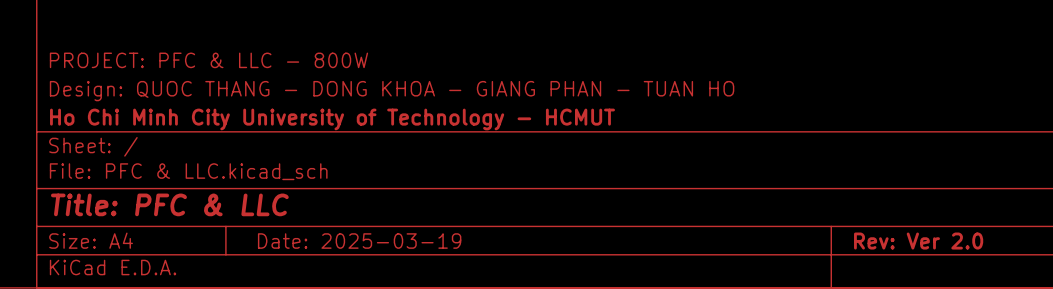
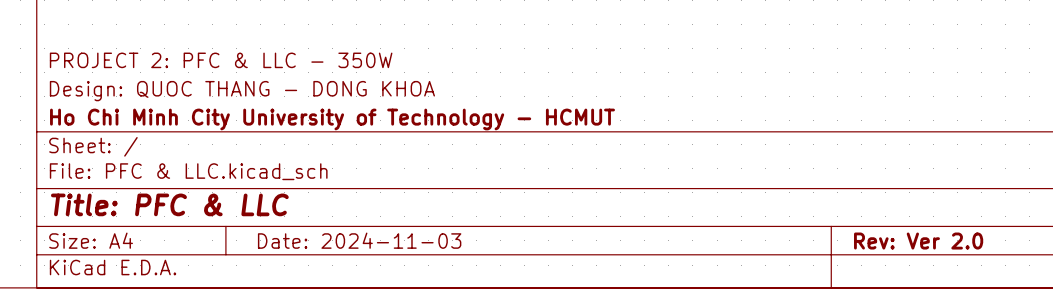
title block: PROJECT: PFC & LLC - 800W (208, 60) -> PROJECT 2: PFC & LLC - 350W (221, 60)
title block: Design: QUOC THANG - DONG KHOA - GIANG PHAN - TUAN HO (392, 91) -> Design: QUOC THANG - DONG KHOA (242, 91)
title block: Date: 2025-03-19 (359, 241) -> Date: 2024-11-03 (359, 240)

